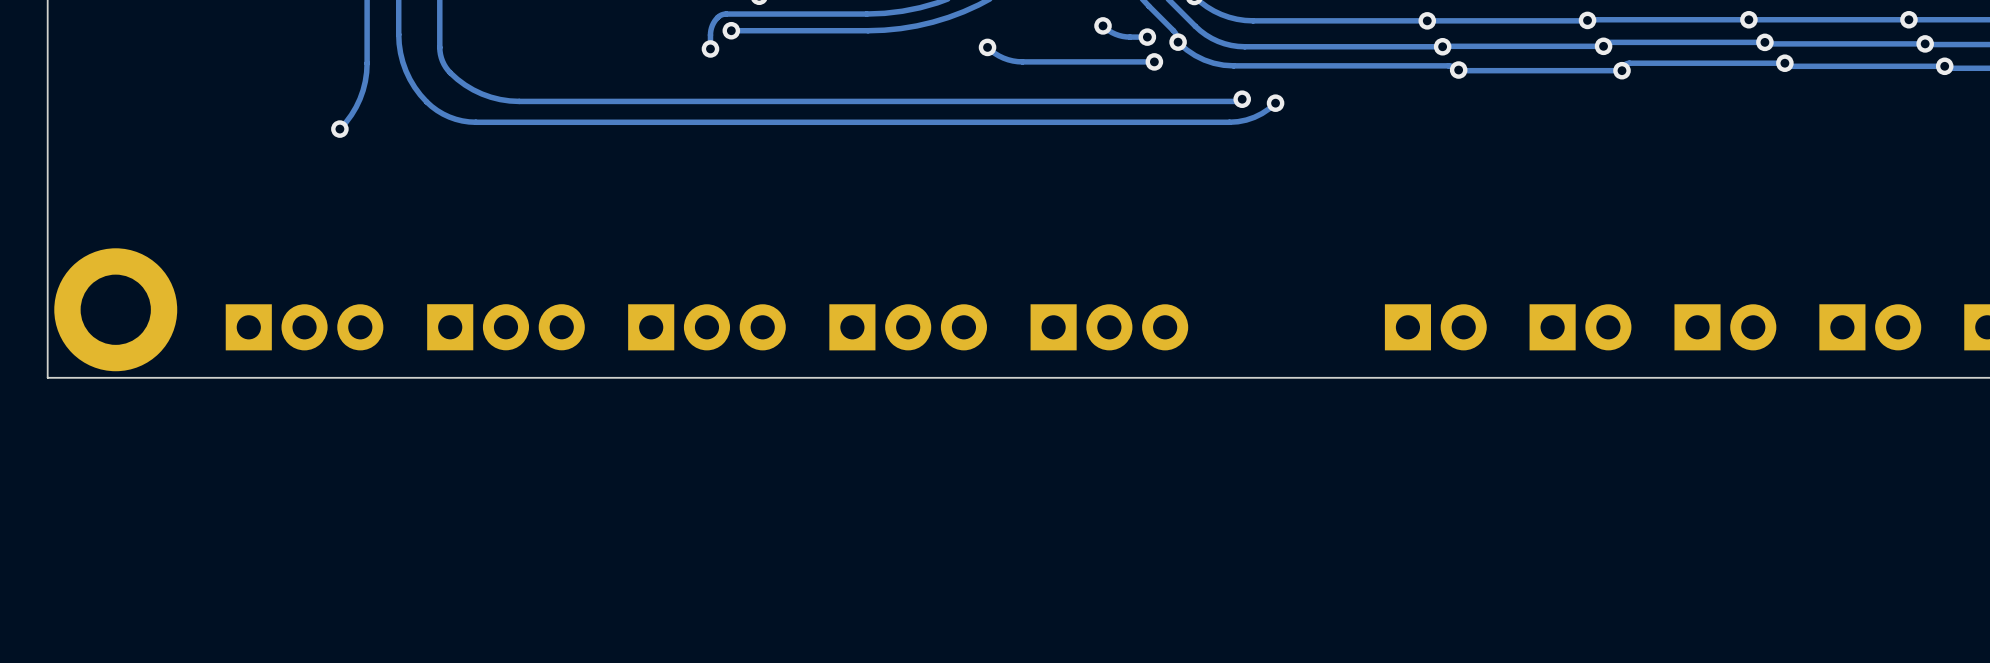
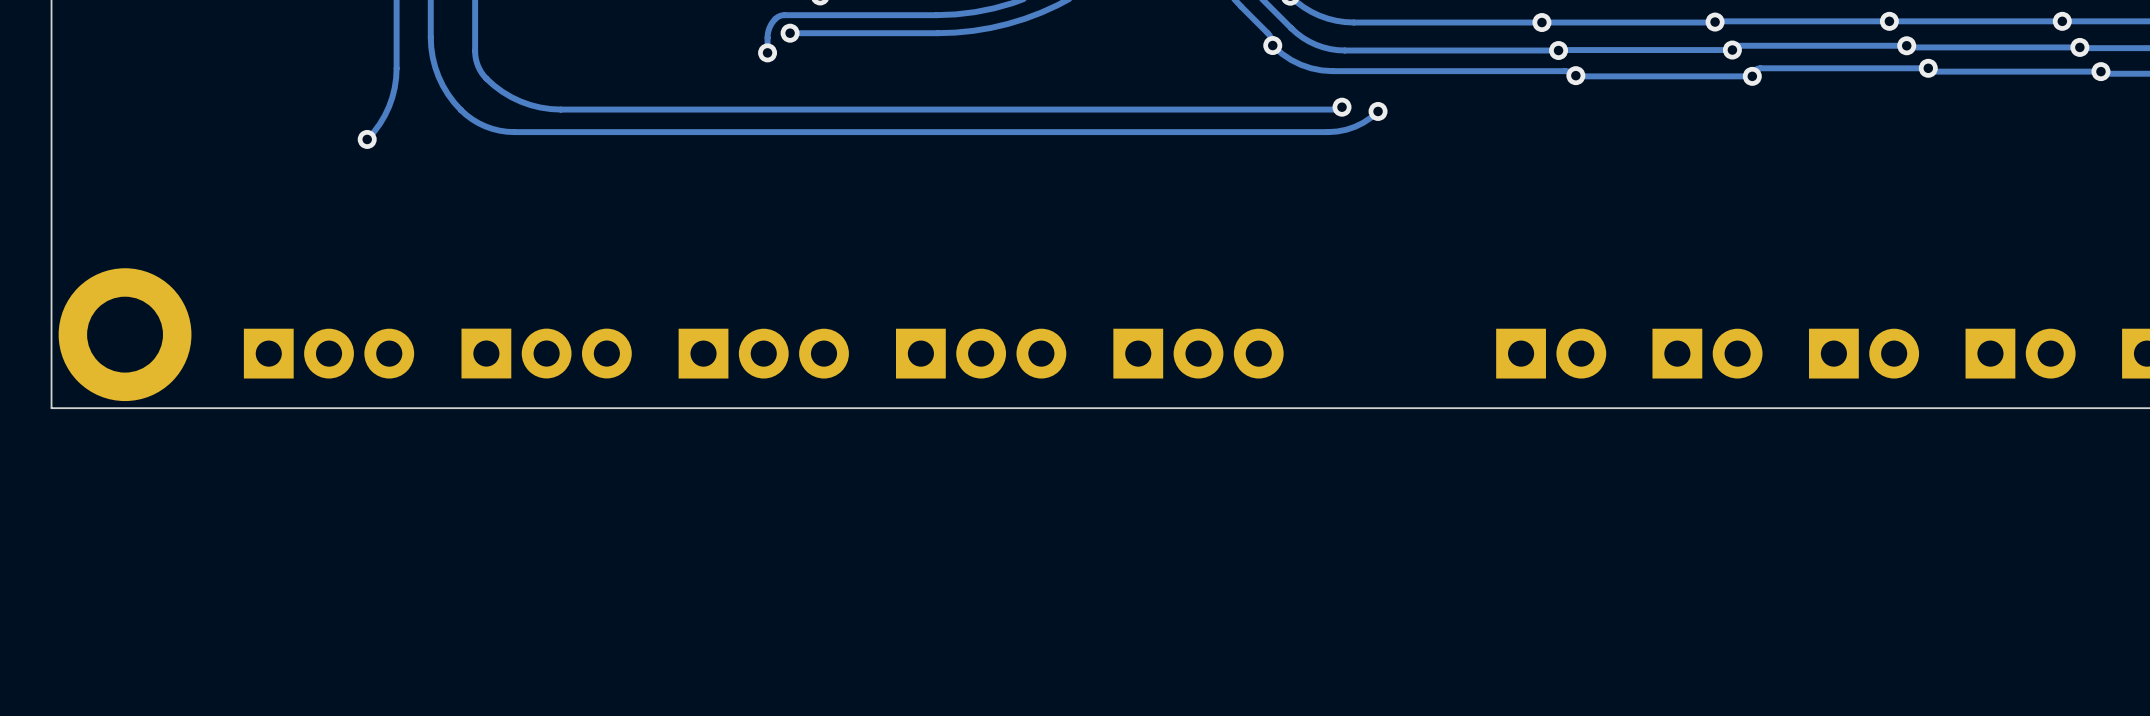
track: (1103, 25) (1118, 35) (1147, 37) -> none
via: (1103, 25) -> none
via: (1147, 37) -> none
track: (987, 47) (1003, 58) (1017, 61) (1154, 61) -> none
via: (987, 47) -> none
via: (1154, 61) -> none

